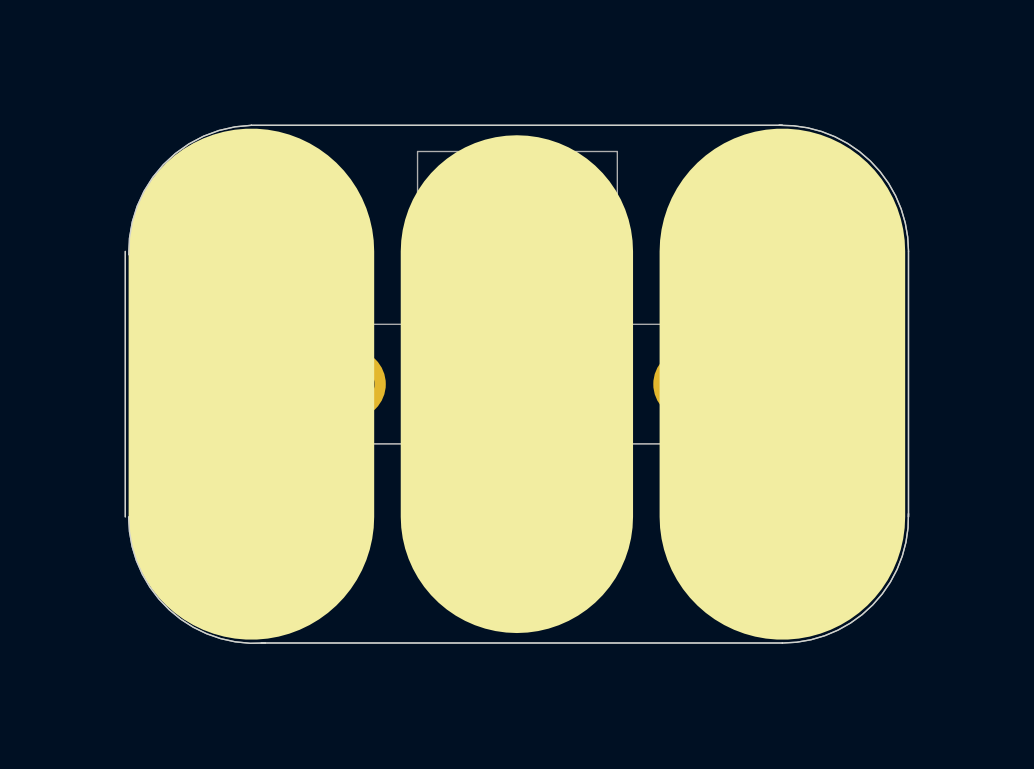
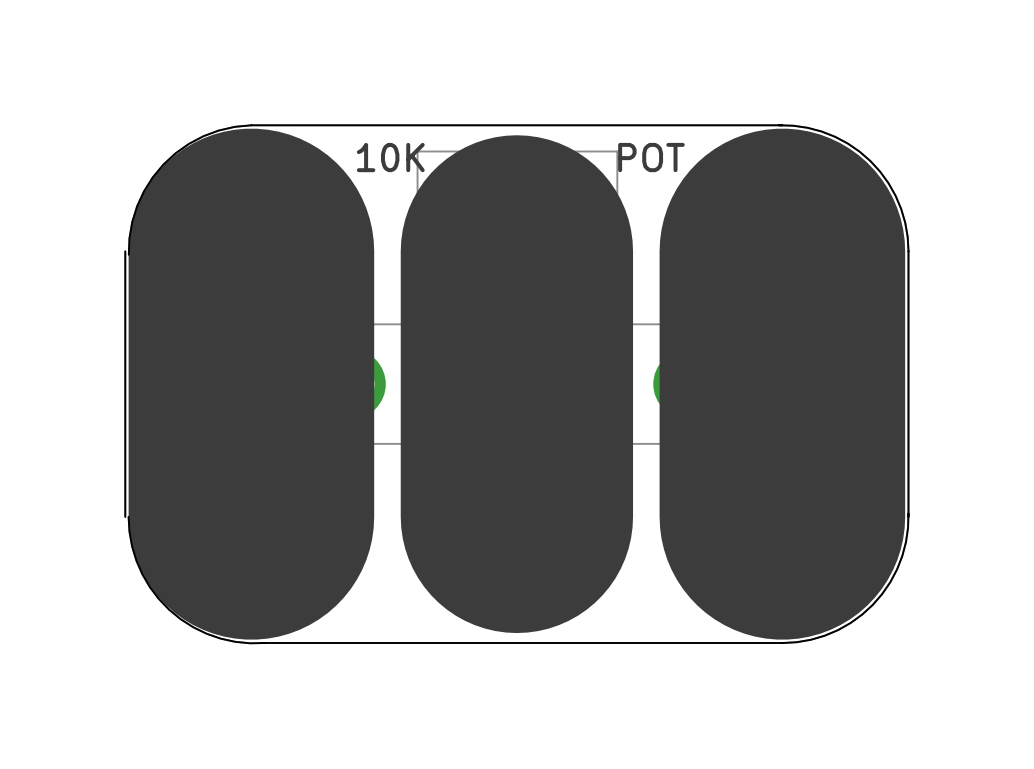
part text: none -> 10K (390, 157)
part text: none -> POT (651, 157)

